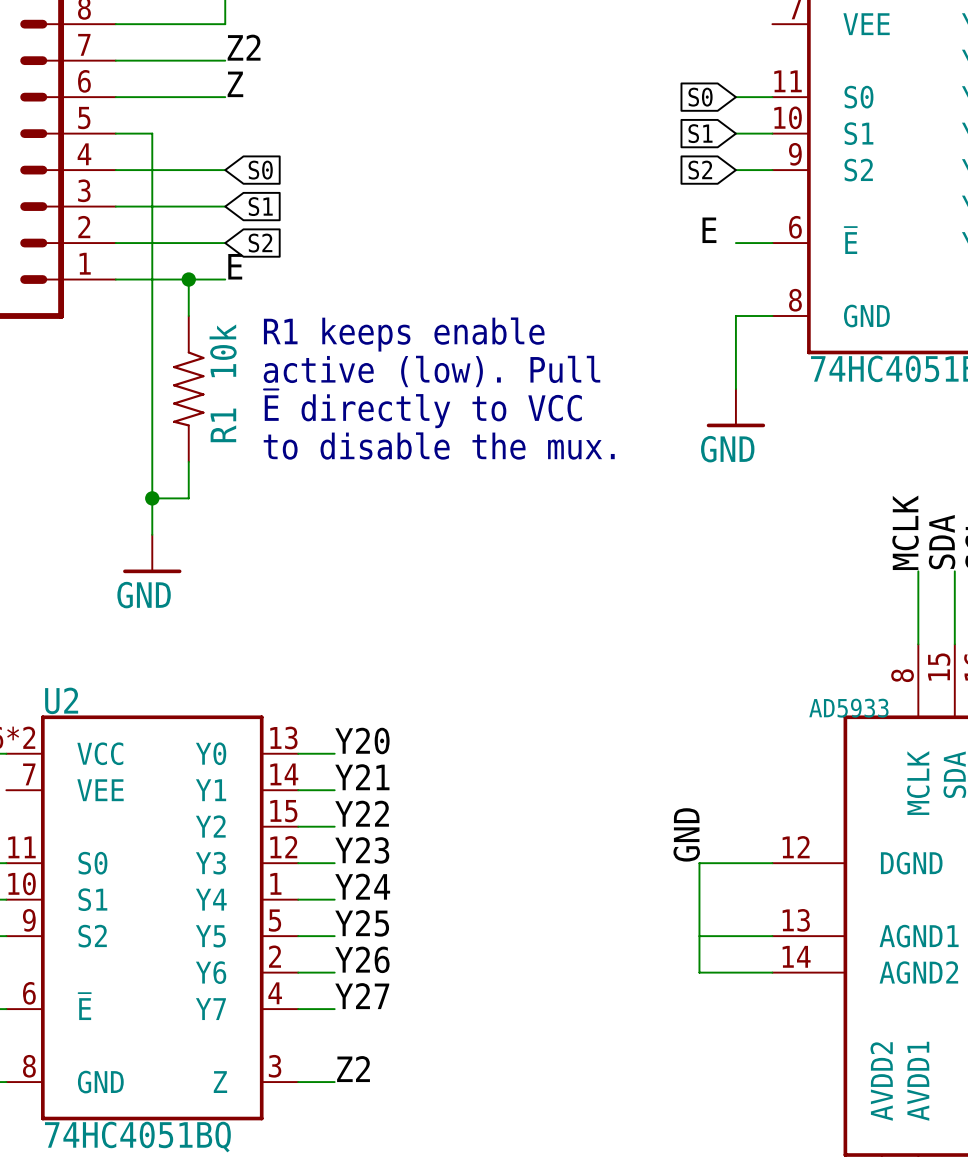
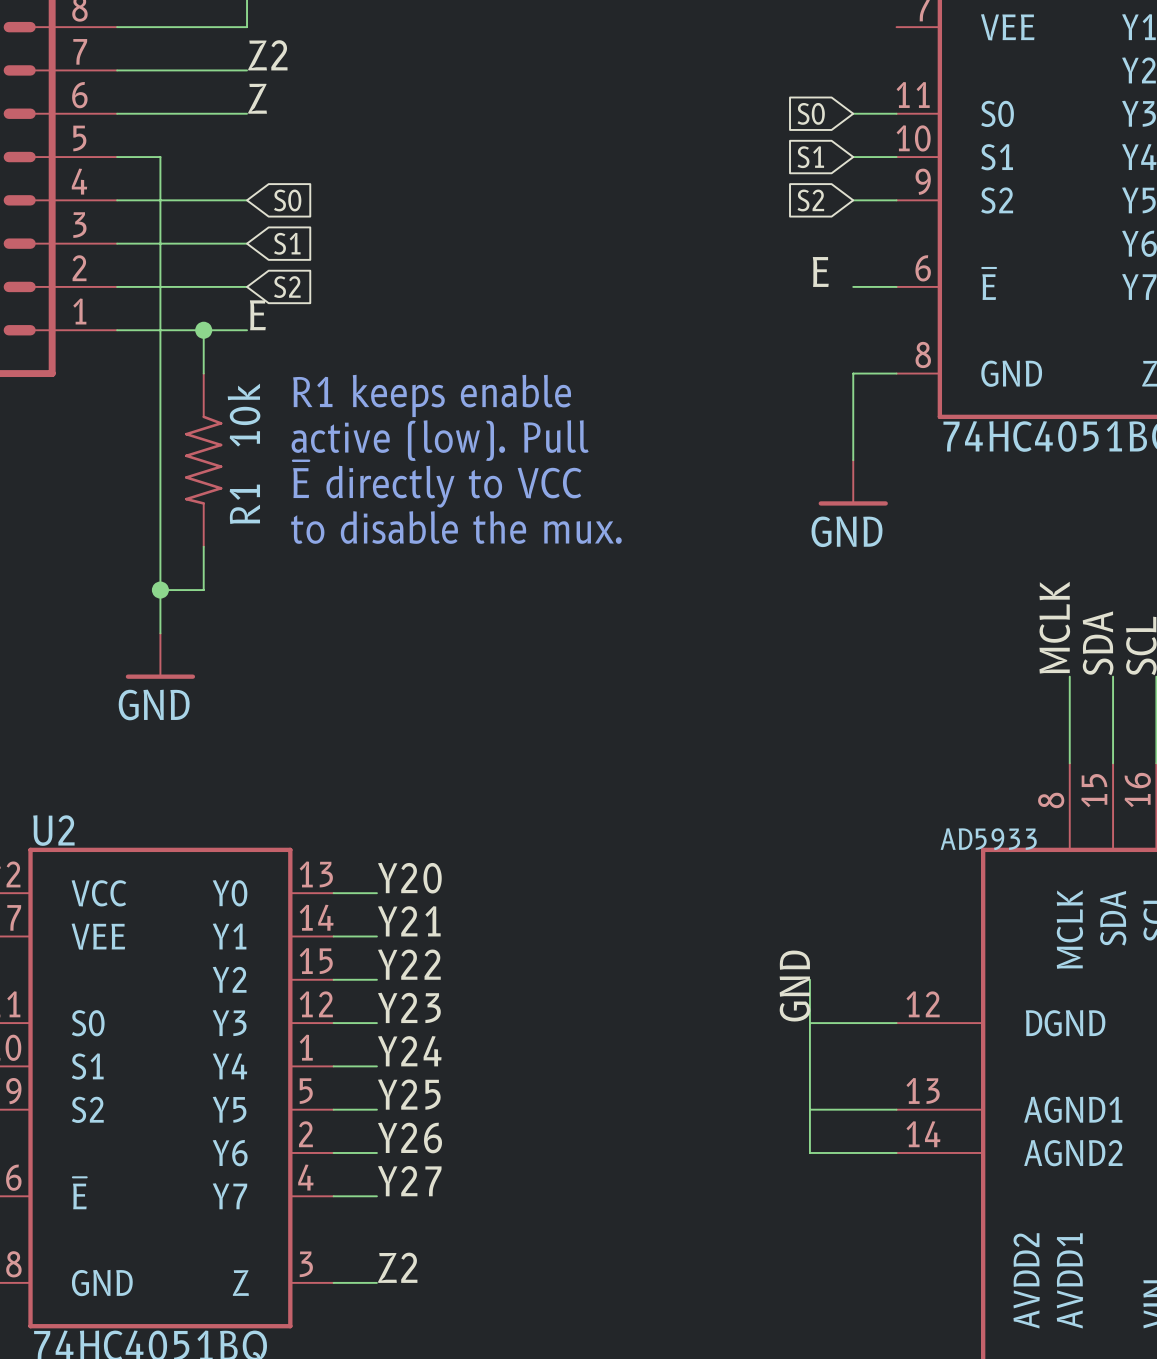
wire: none -> (809, 979) (809, 1023)

